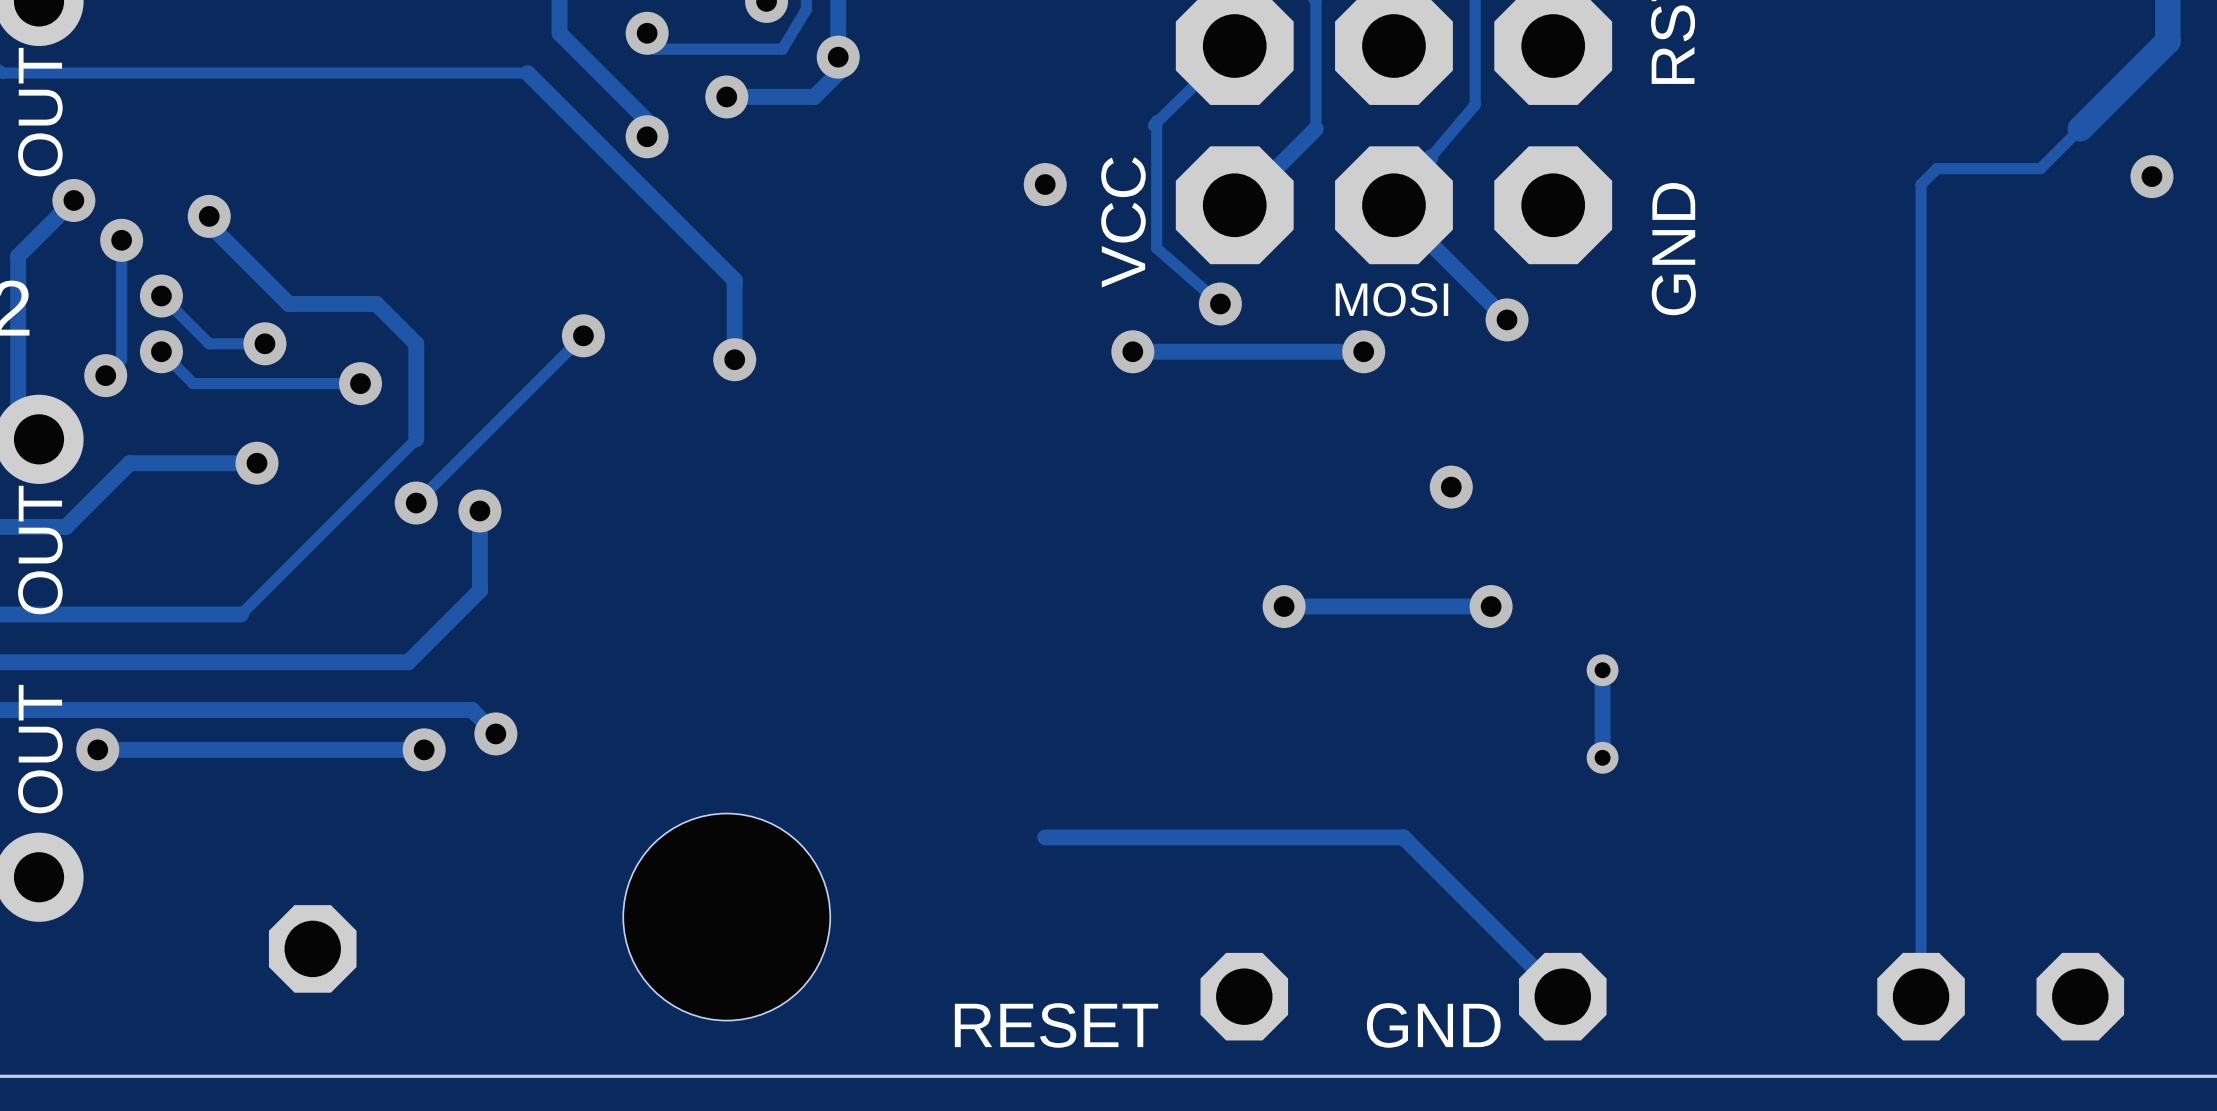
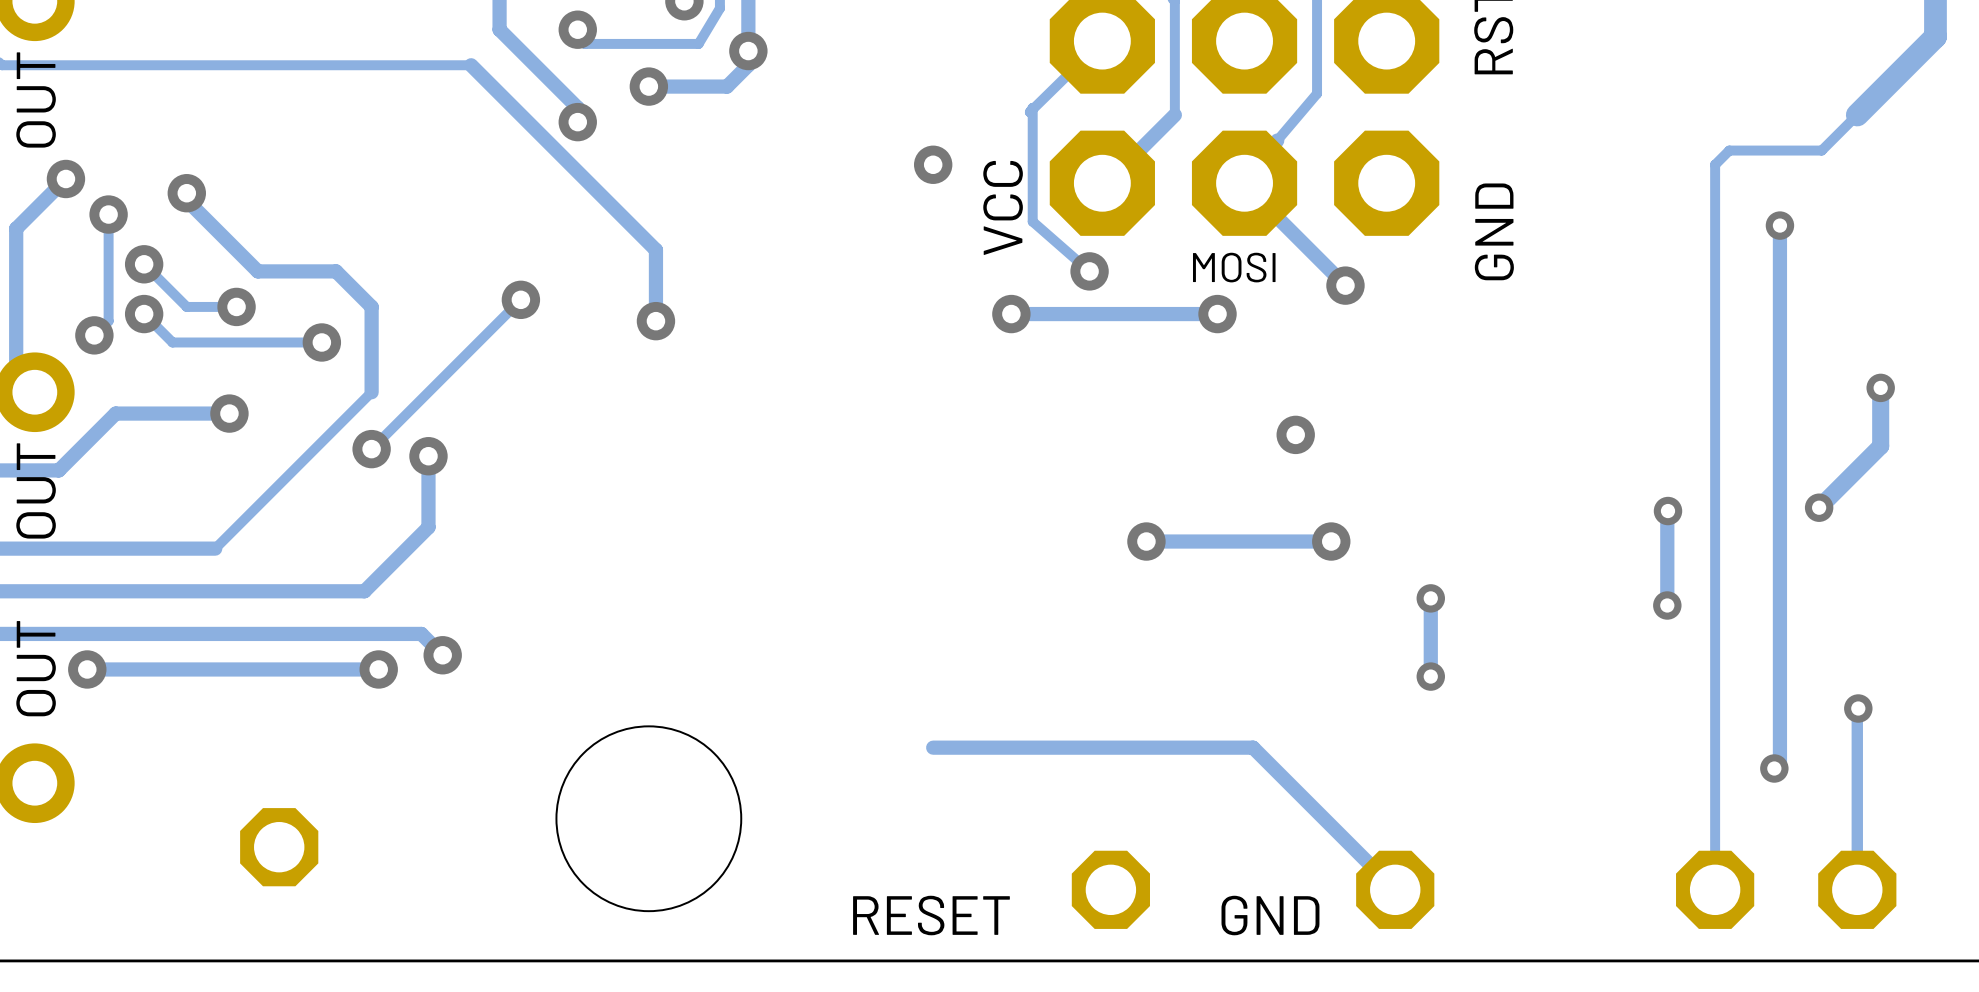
via: (2151, 176) -> none
track: none -> (1779, 225) (1779, 762) (1774, 768)
via: none -> (1779, 225)
track: none -> (1880, 387) (1880, 446) (1819, 507)
via: none -> (1880, 387)
via: none -> (1819, 507)
via: none -> (1668, 511)
track: none -> (1667, 511) (1667, 605)
via: none -> (1667, 605)
track: none -> (1858, 708) (1857, 889)
via: none -> (1858, 708)
via: none -> (1774, 768)

